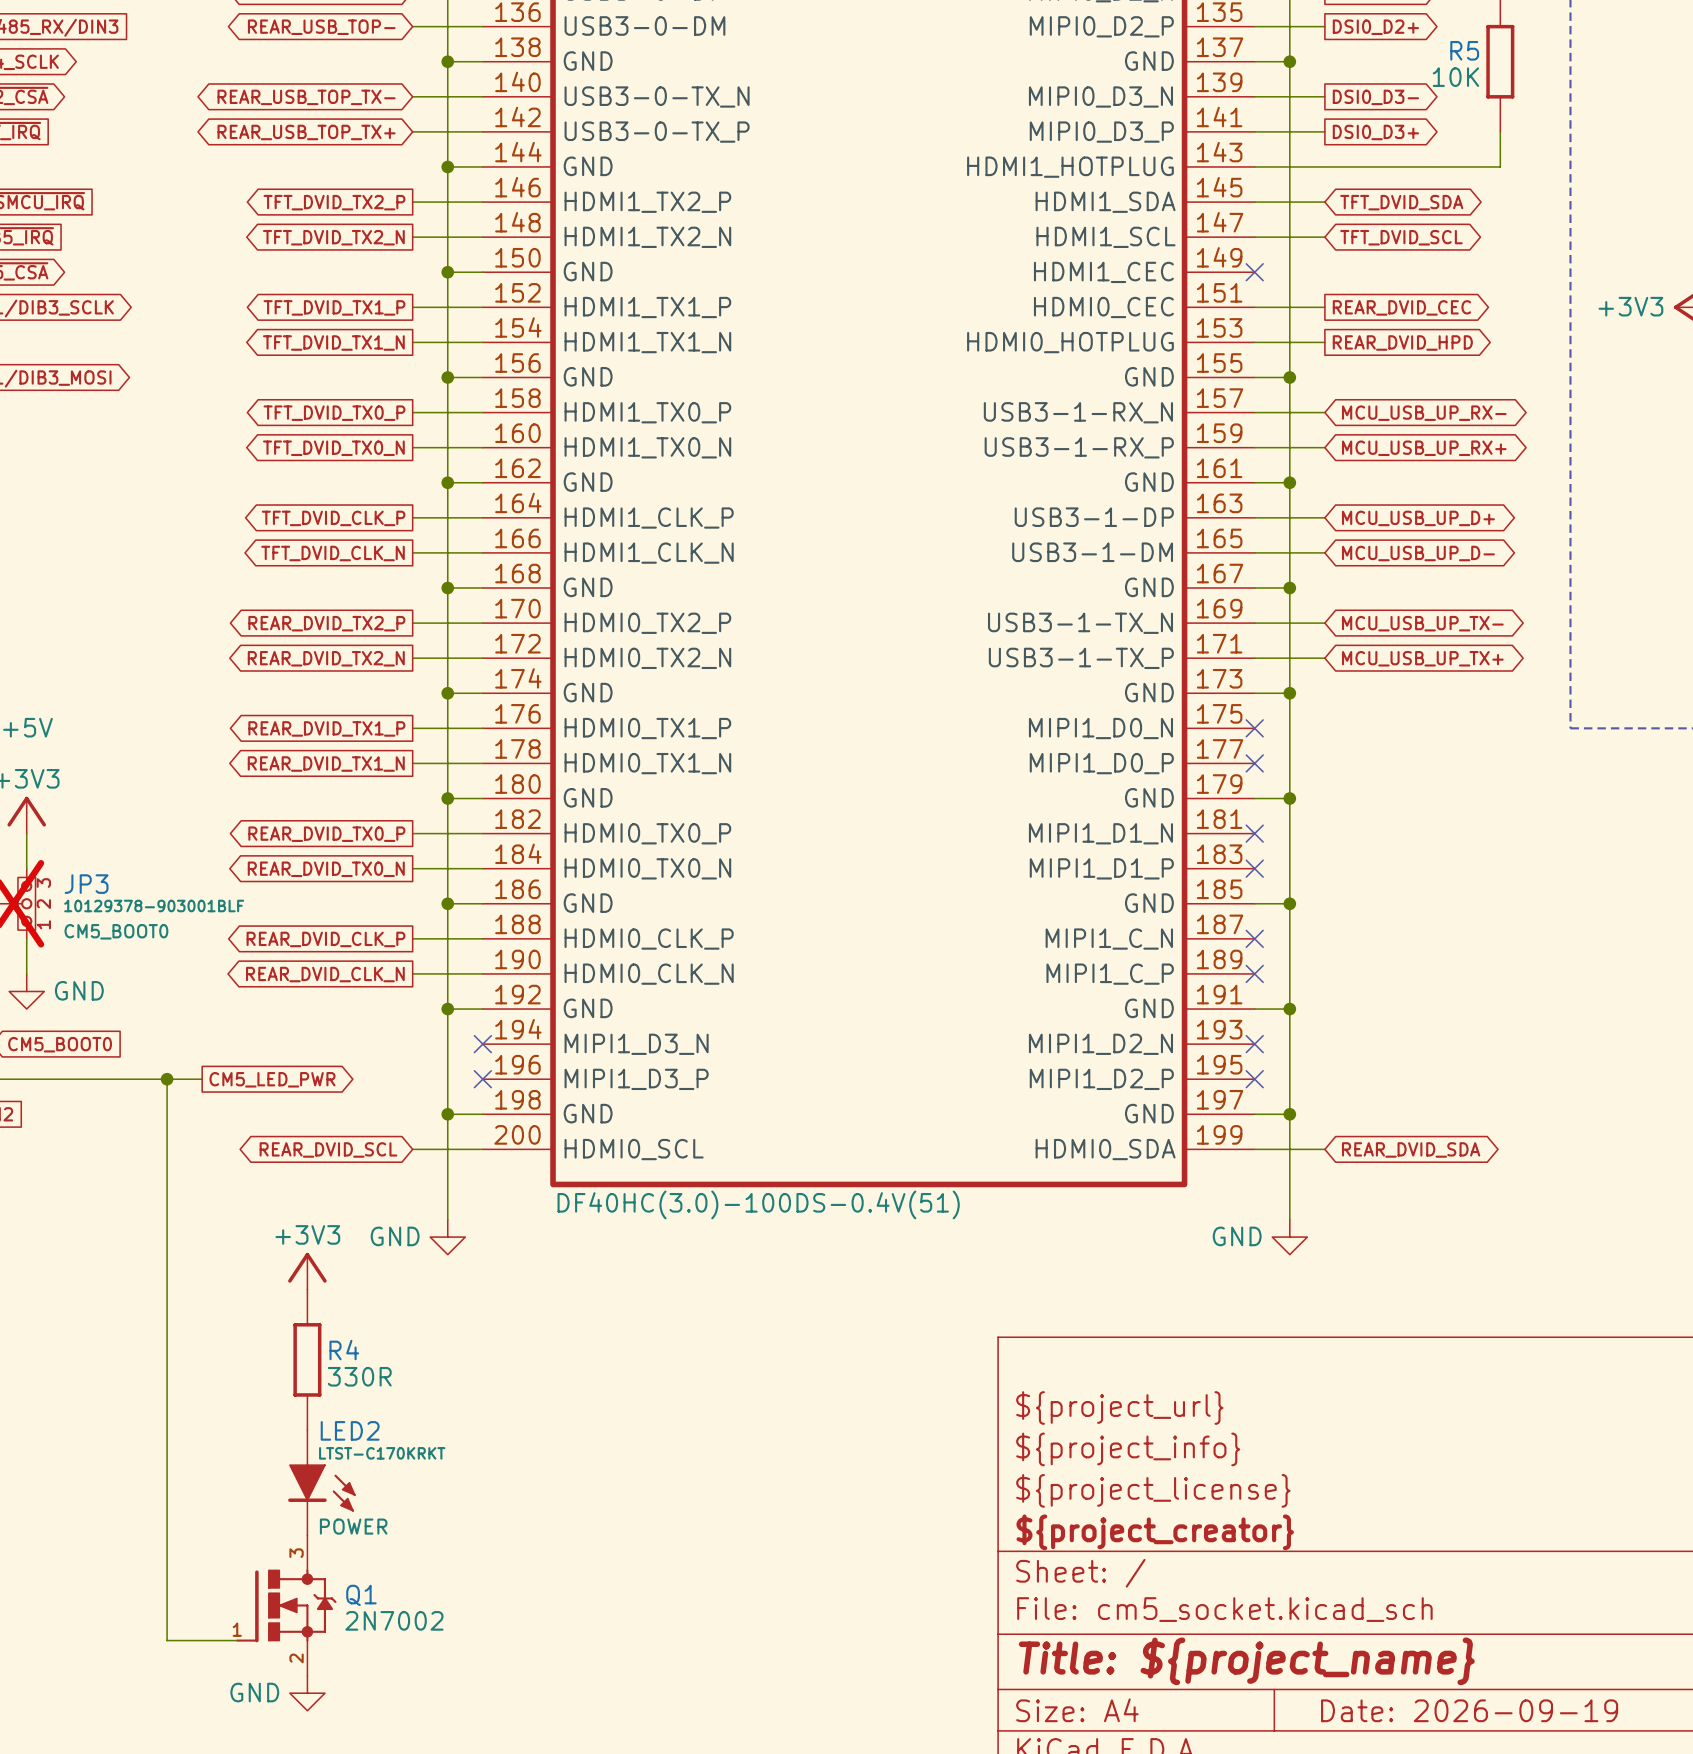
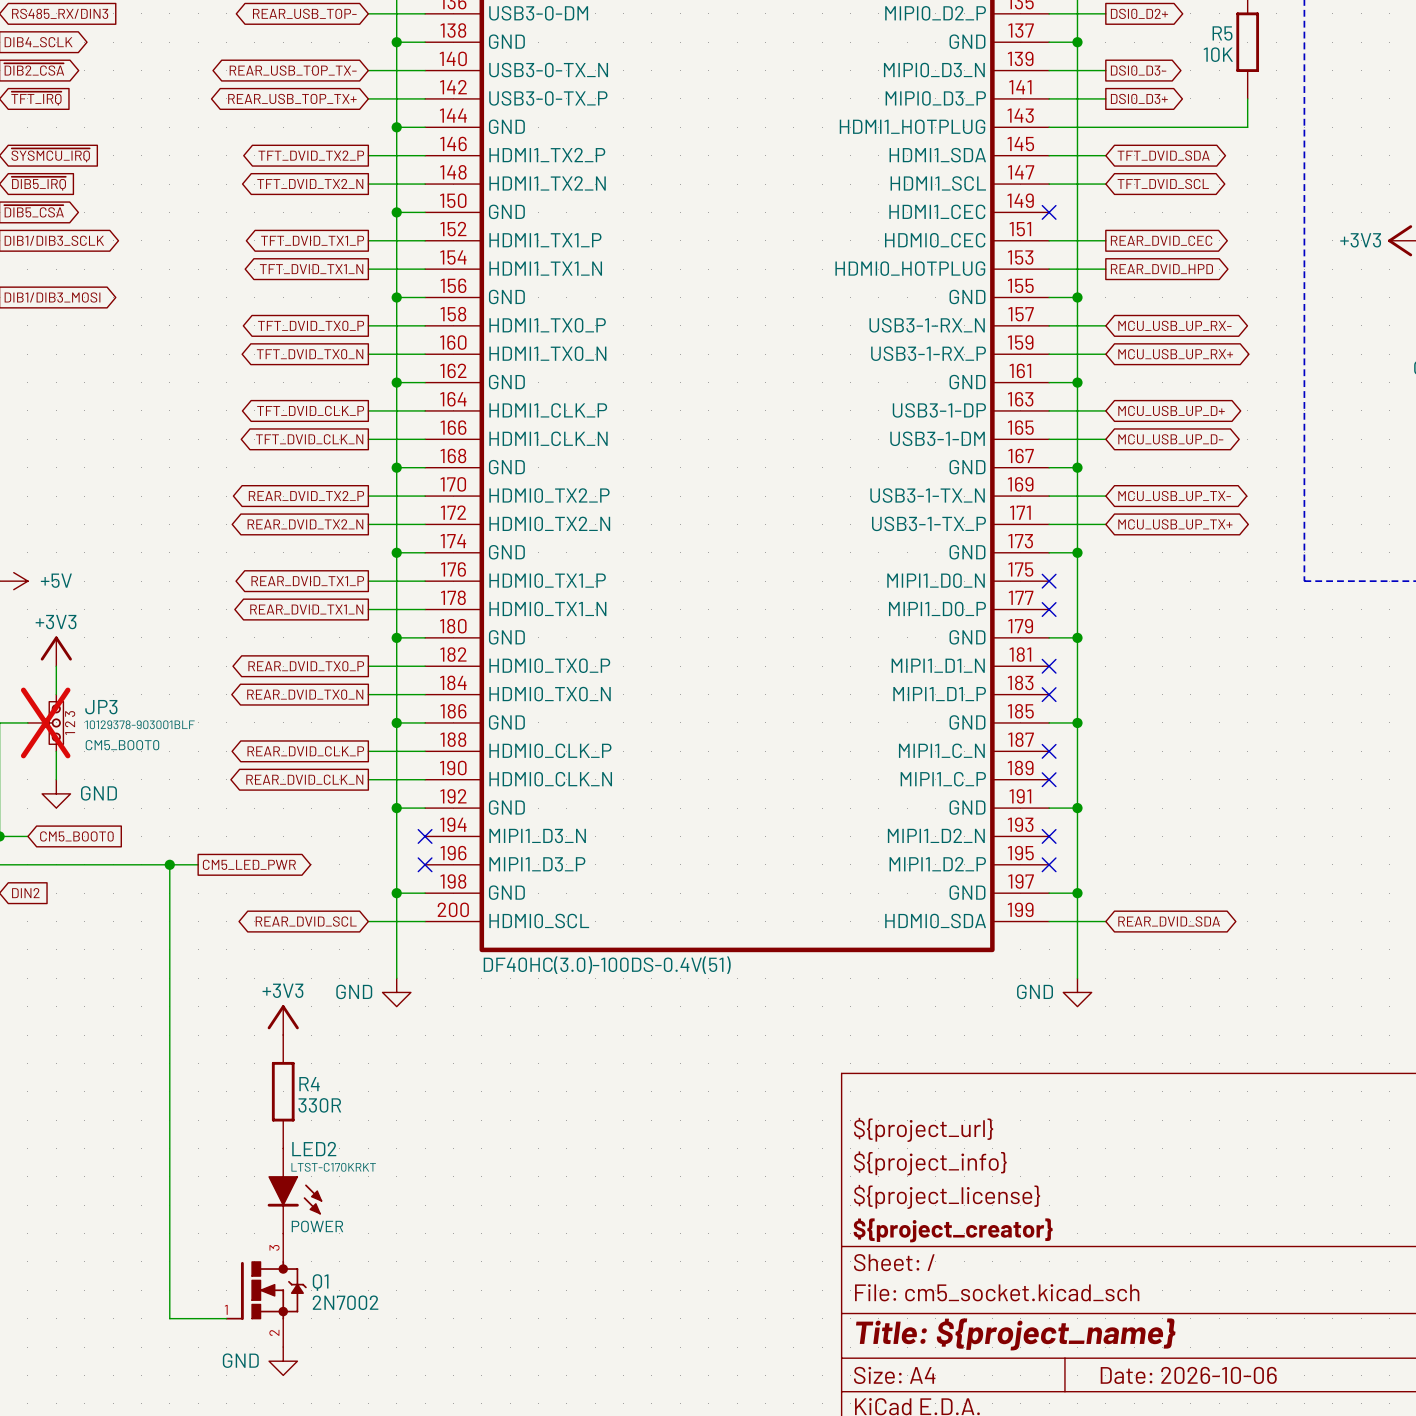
title block: Date: 2026-09-19 (1469, 1710) -> Date: 2026-10-06 (1188, 1375)

